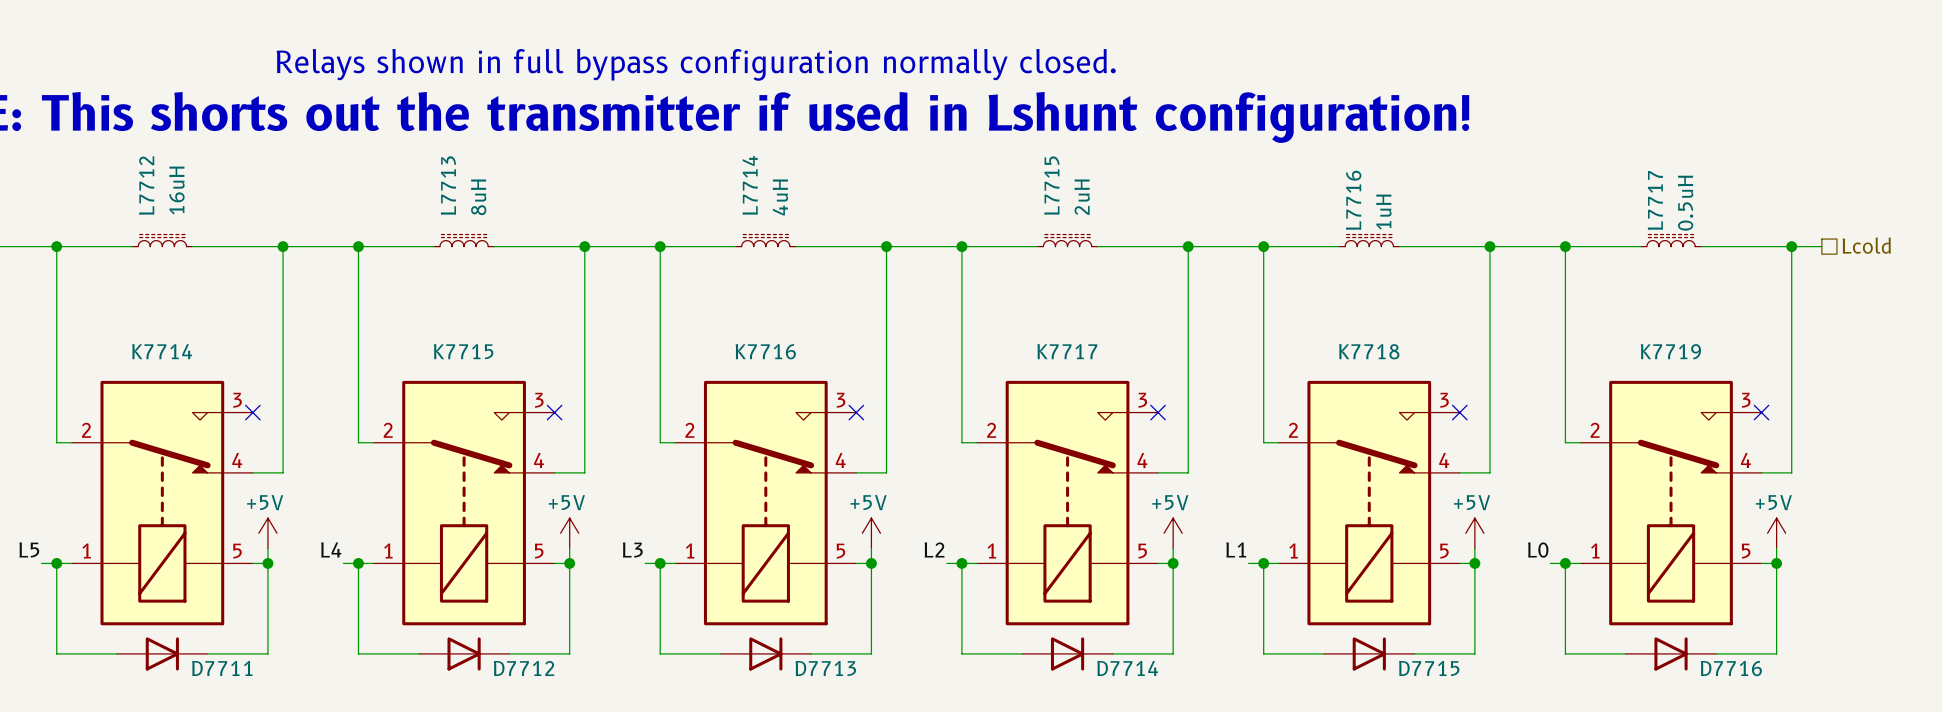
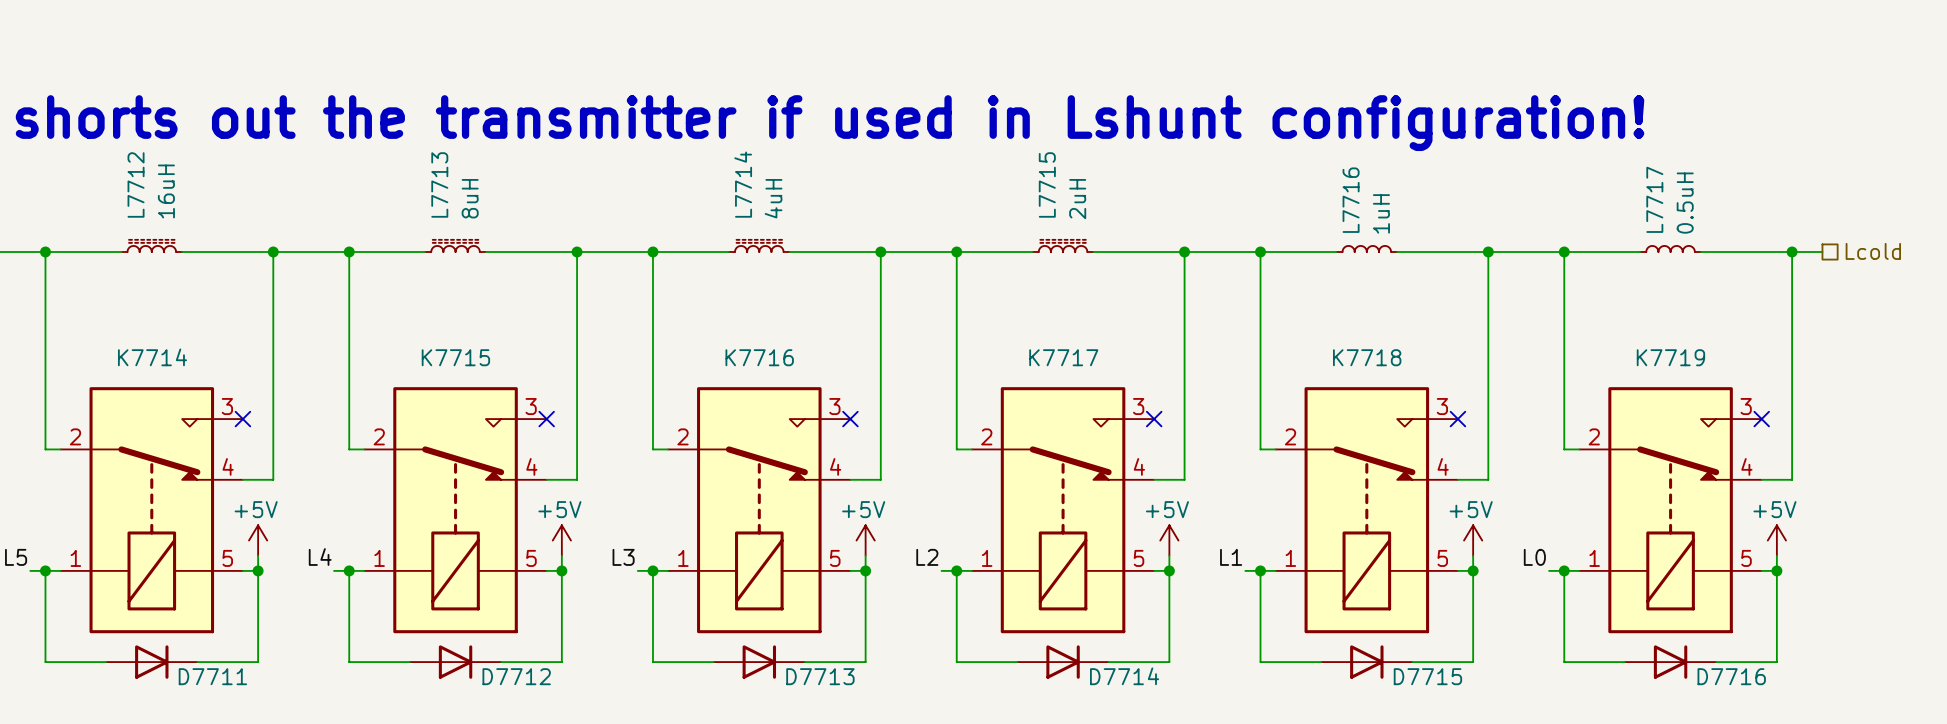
text: Relays shown in full bypass configuration normally closed. (696, 64) -> none
L7716 symbol: [1339, 234, 1400, 247] -> [1336, 245, 1398, 252]
L7717 symbol: [1640, 234, 1702, 247] -> [1640, 245, 1701, 252]

